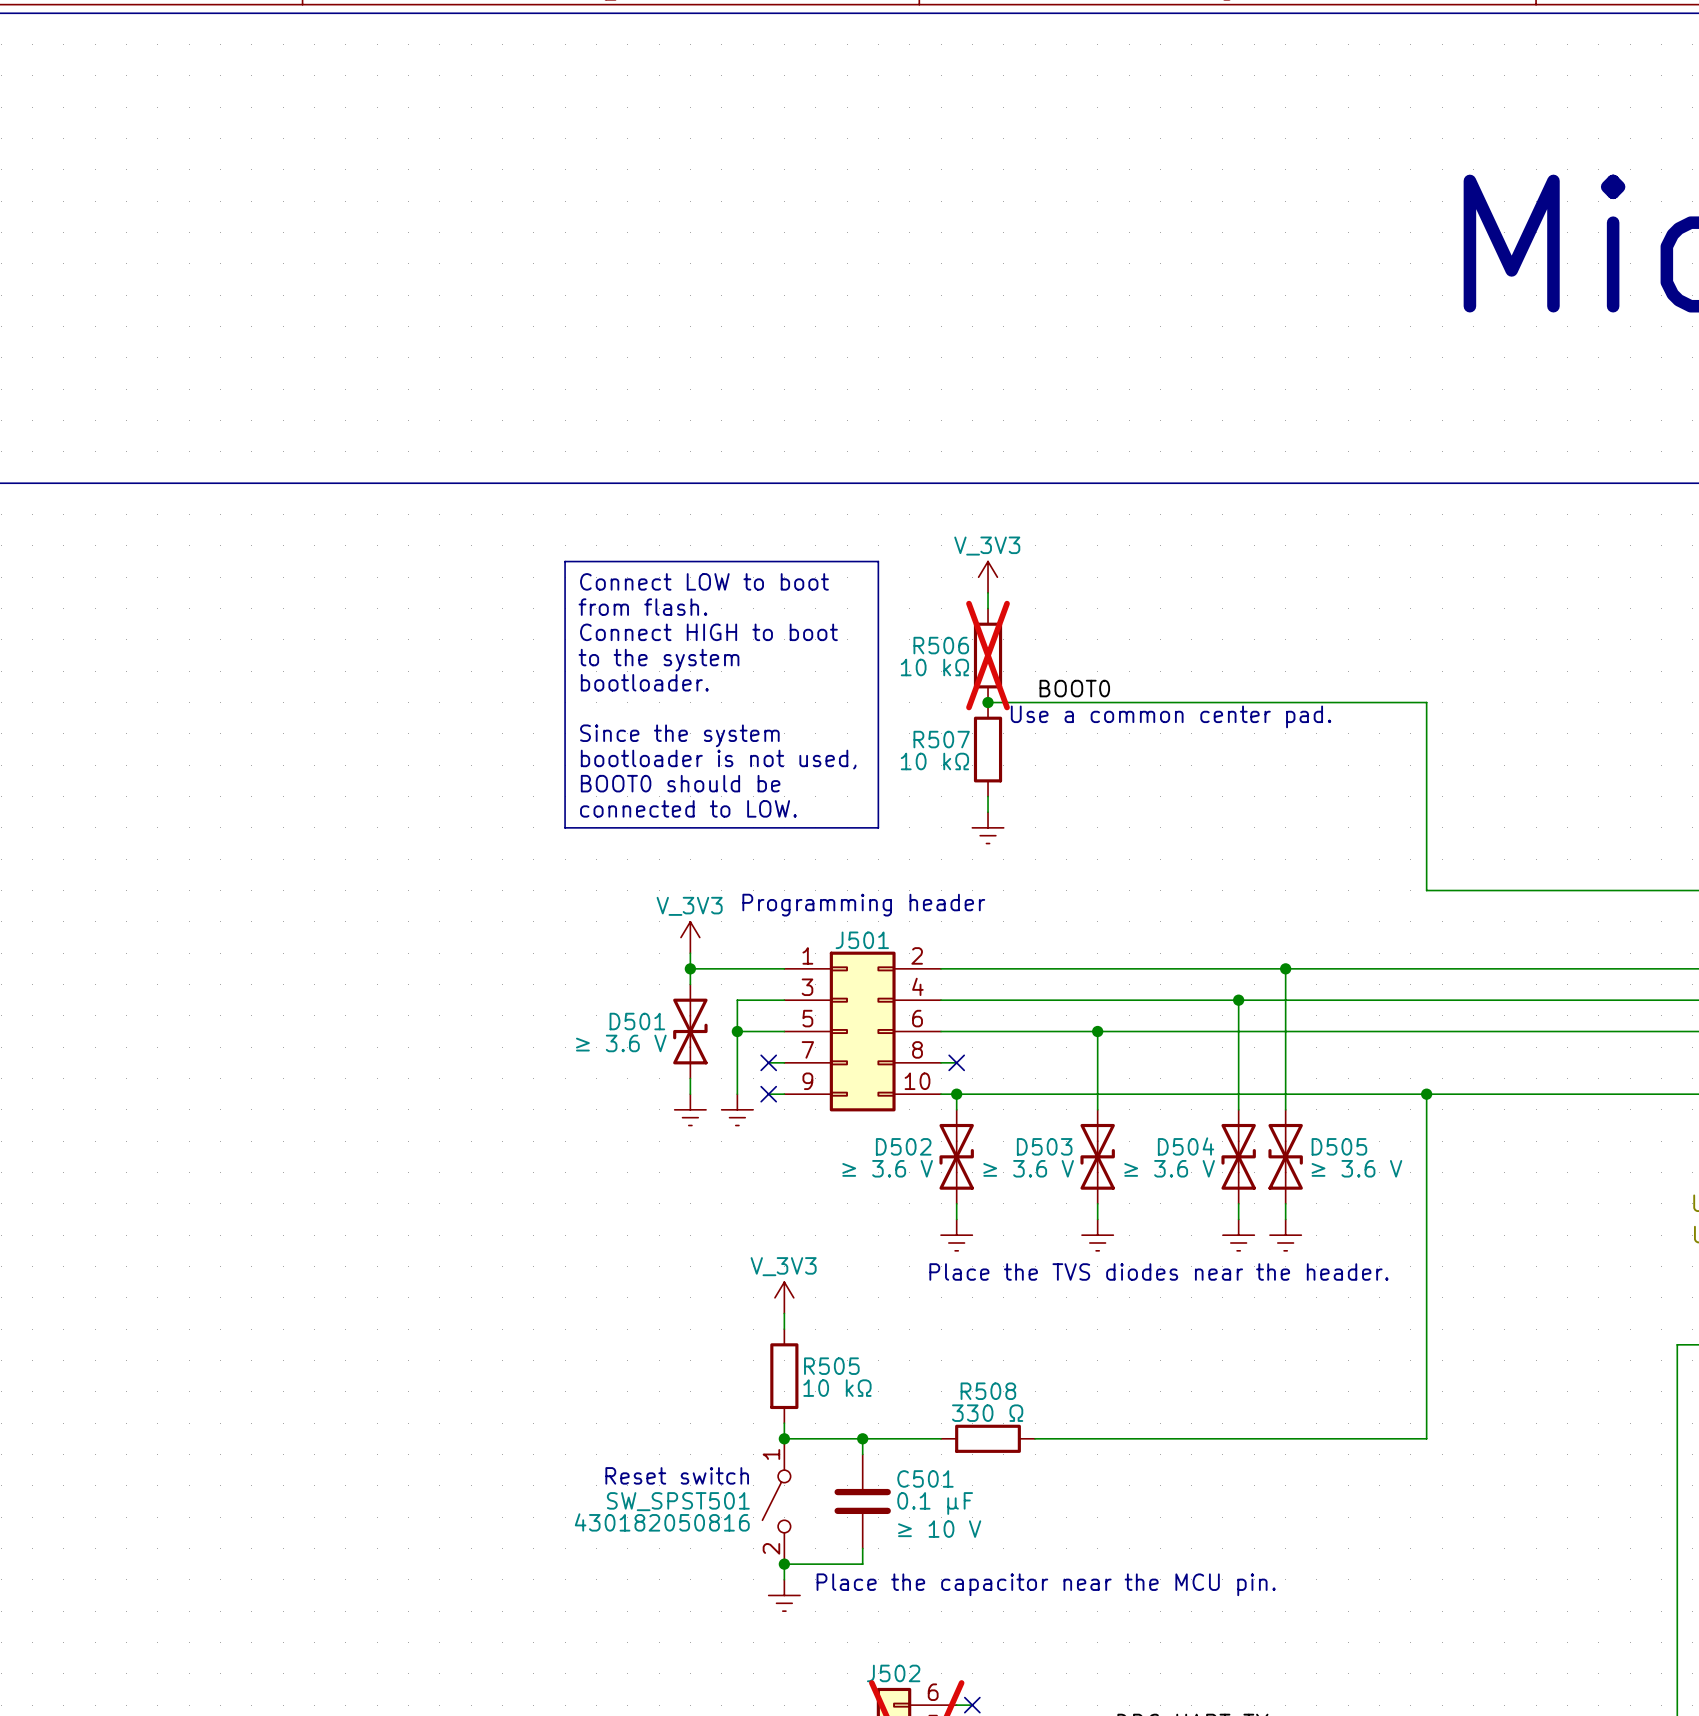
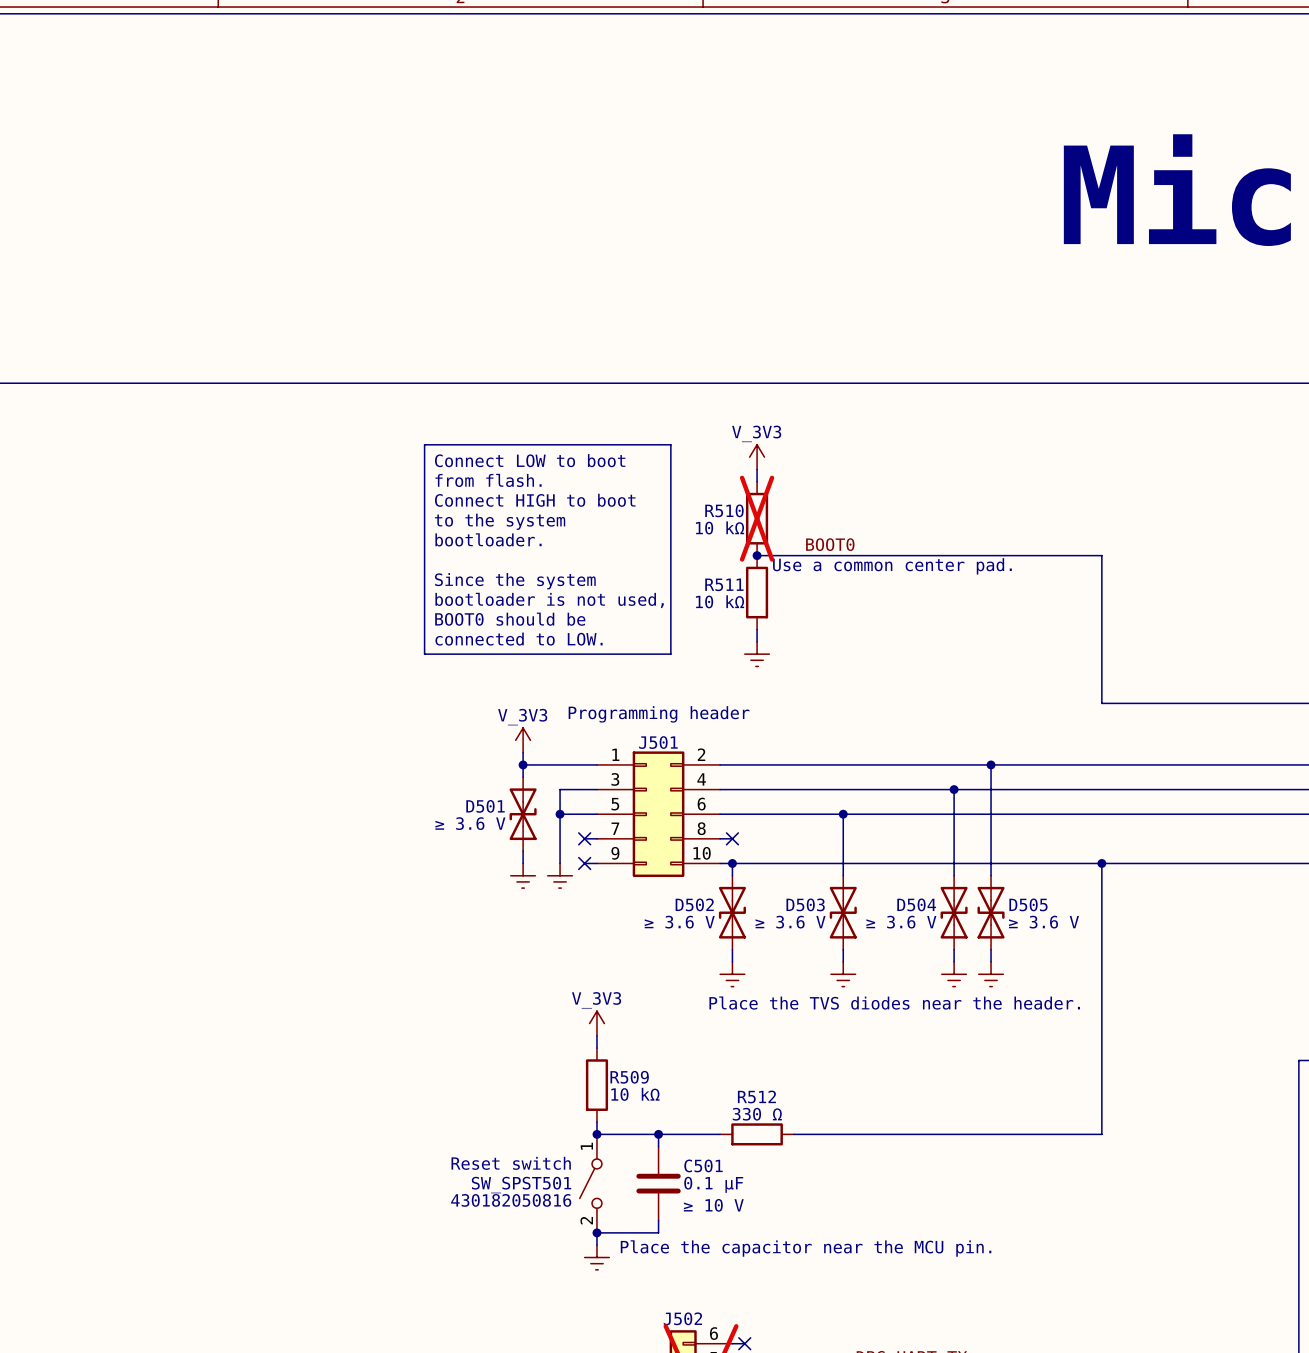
R506 name: R506 (941, 645) -> R510 (724, 510)
R507 name: R507 (941, 739) -> R511 (724, 584)
R505 name: R505 (831, 1366) -> R509 (629, 1077)
R508 name: R508 (988, 1391) -> R512 (756, 1096)

